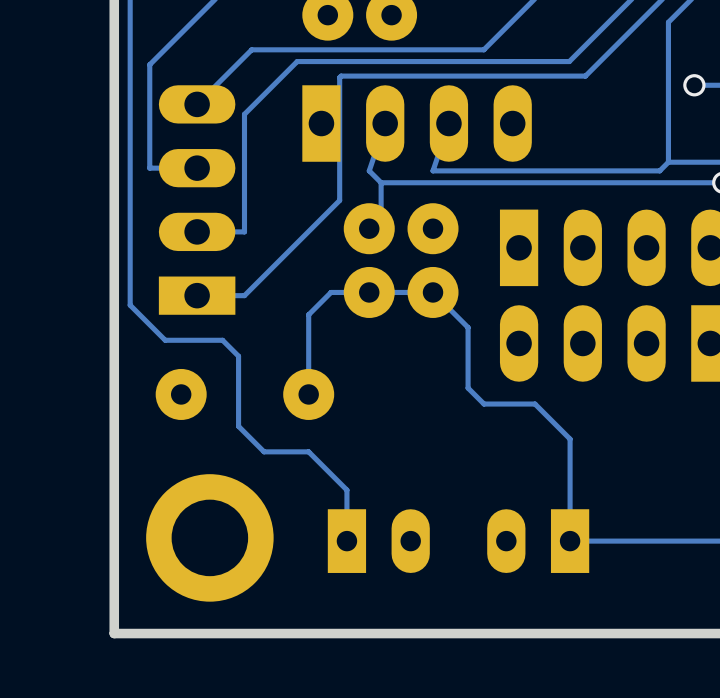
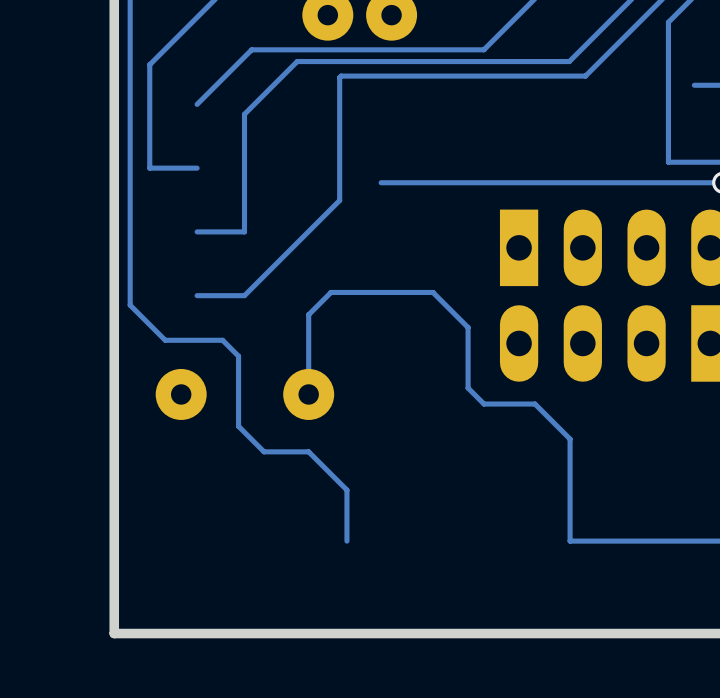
via: (694, 85) -> none
track: (385, 123) (369, 170) (381, 182) (381, 216) (369, 228) -> none
part: (417, 123) -> none
track: (448, 123) (433, 170) (659, 170) (668, 162) -> none
part: (197, 200) -> none
part: (369, 260) -> none
part: (433, 260) -> none
part: (209, 537) -> none
part: (378, 541) -> none
part: (538, 541) -> none

